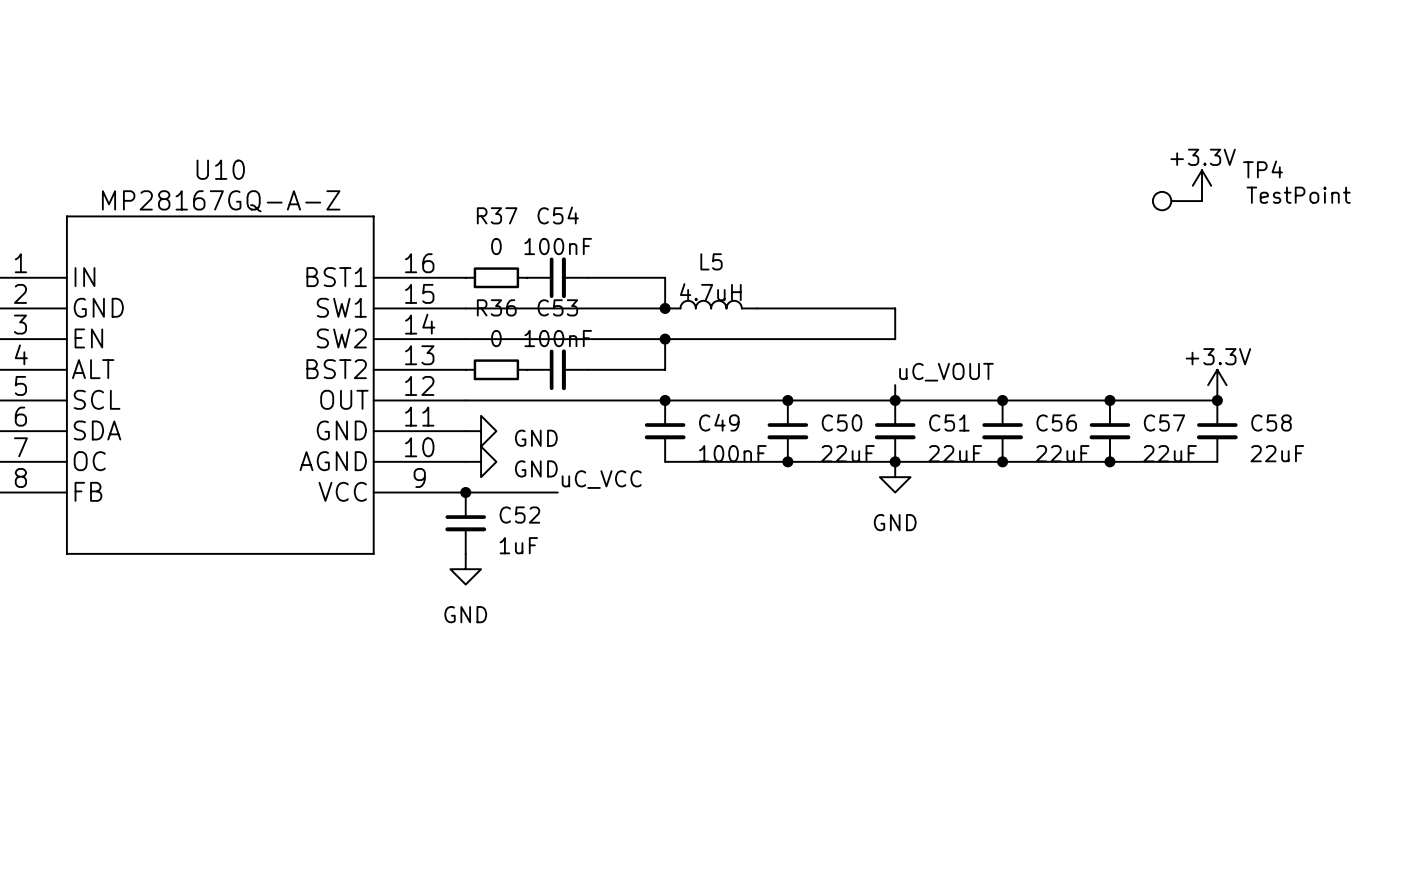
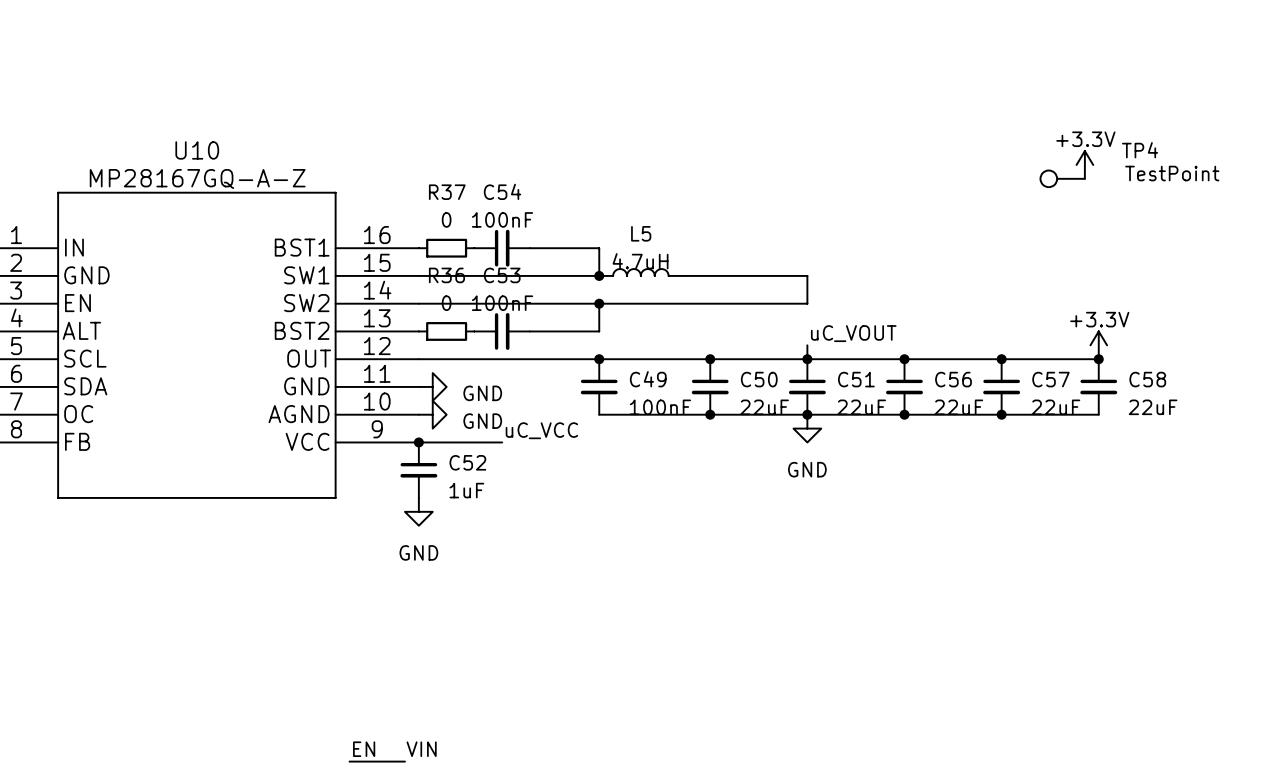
label: none -> EN (364, 749)
label: none -> VIN (421, 749)
wire: none -> (349, 761) (405, 761)

